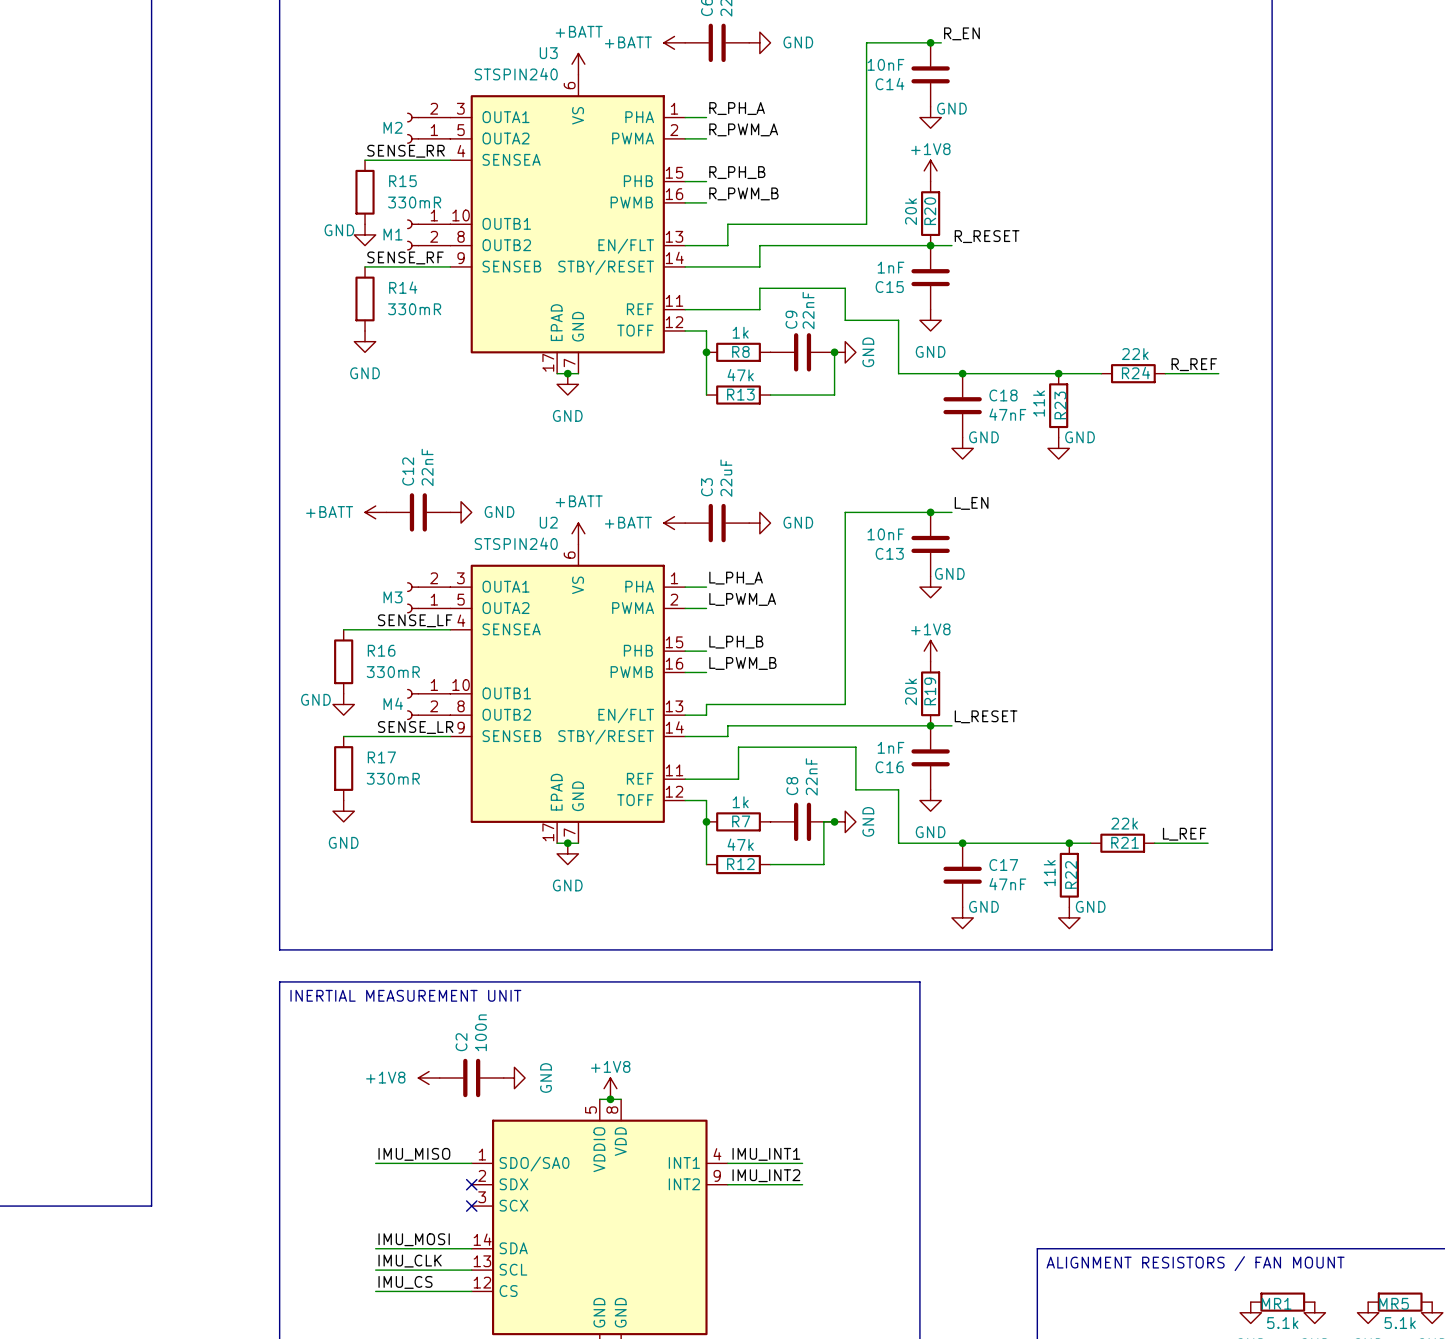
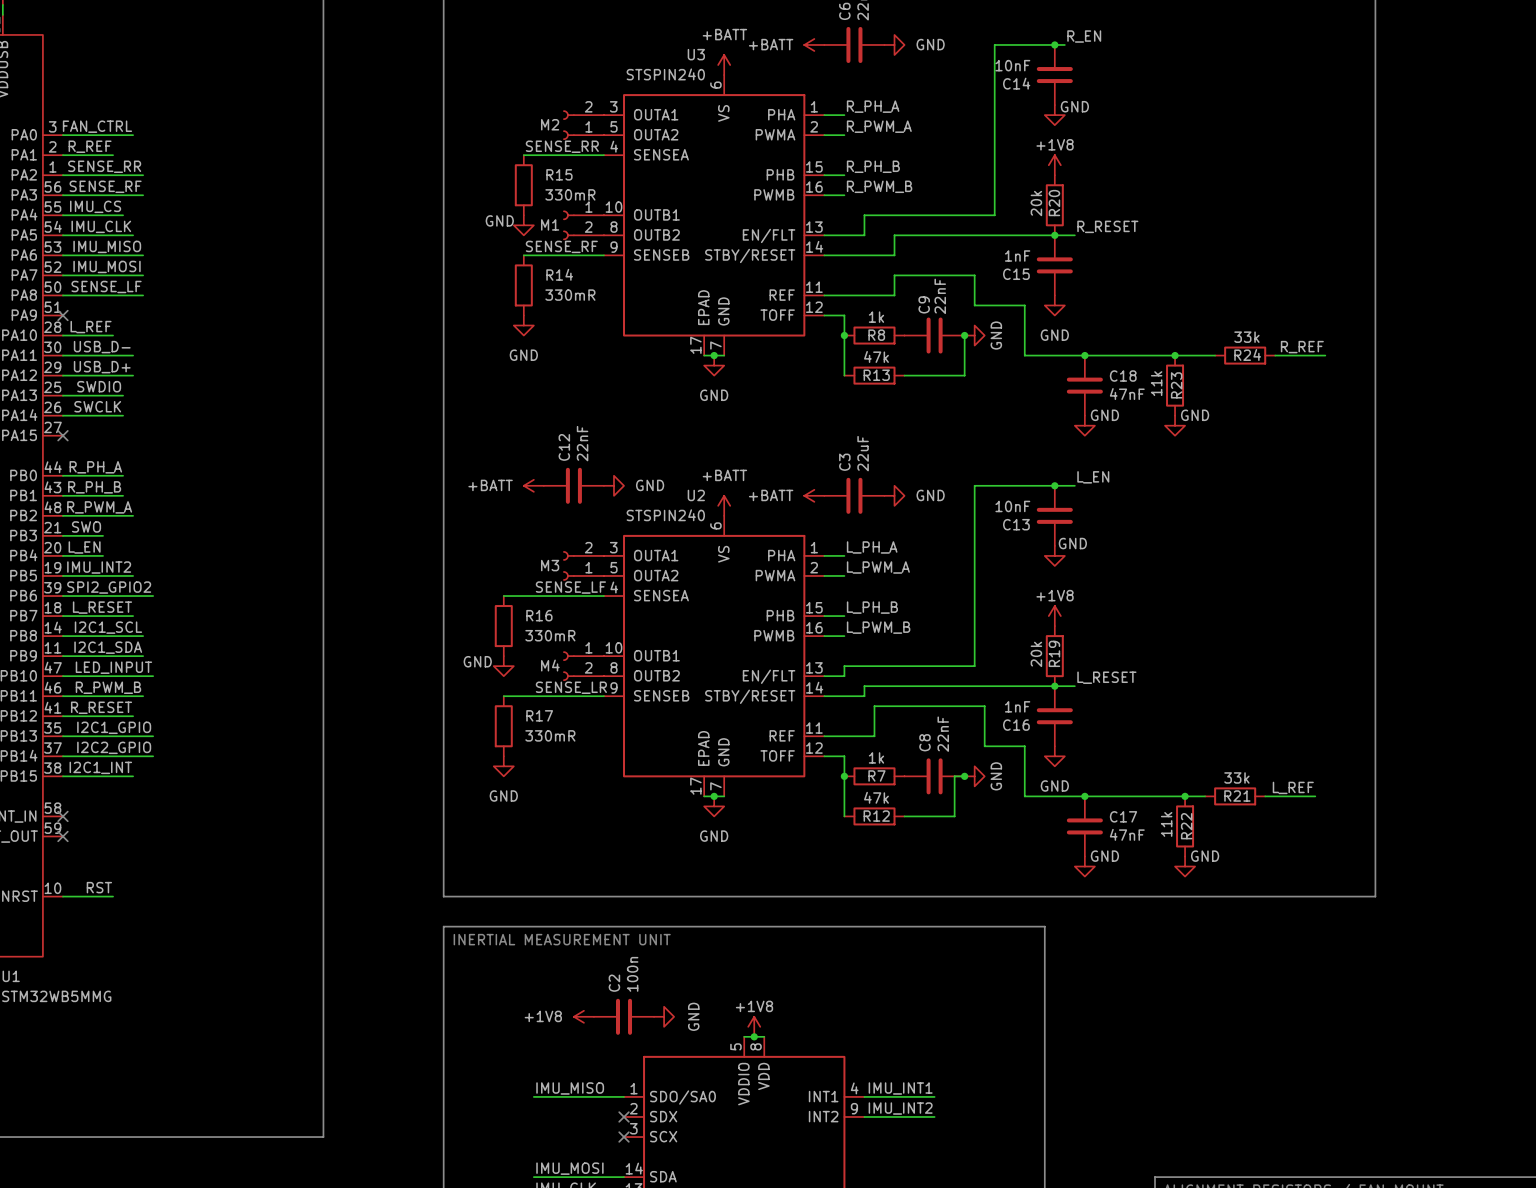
R24 value: 22k (1135, 354) -> 33k (1246, 337)
R21 value: 22k (1124, 823) -> 33k (1236, 777)

